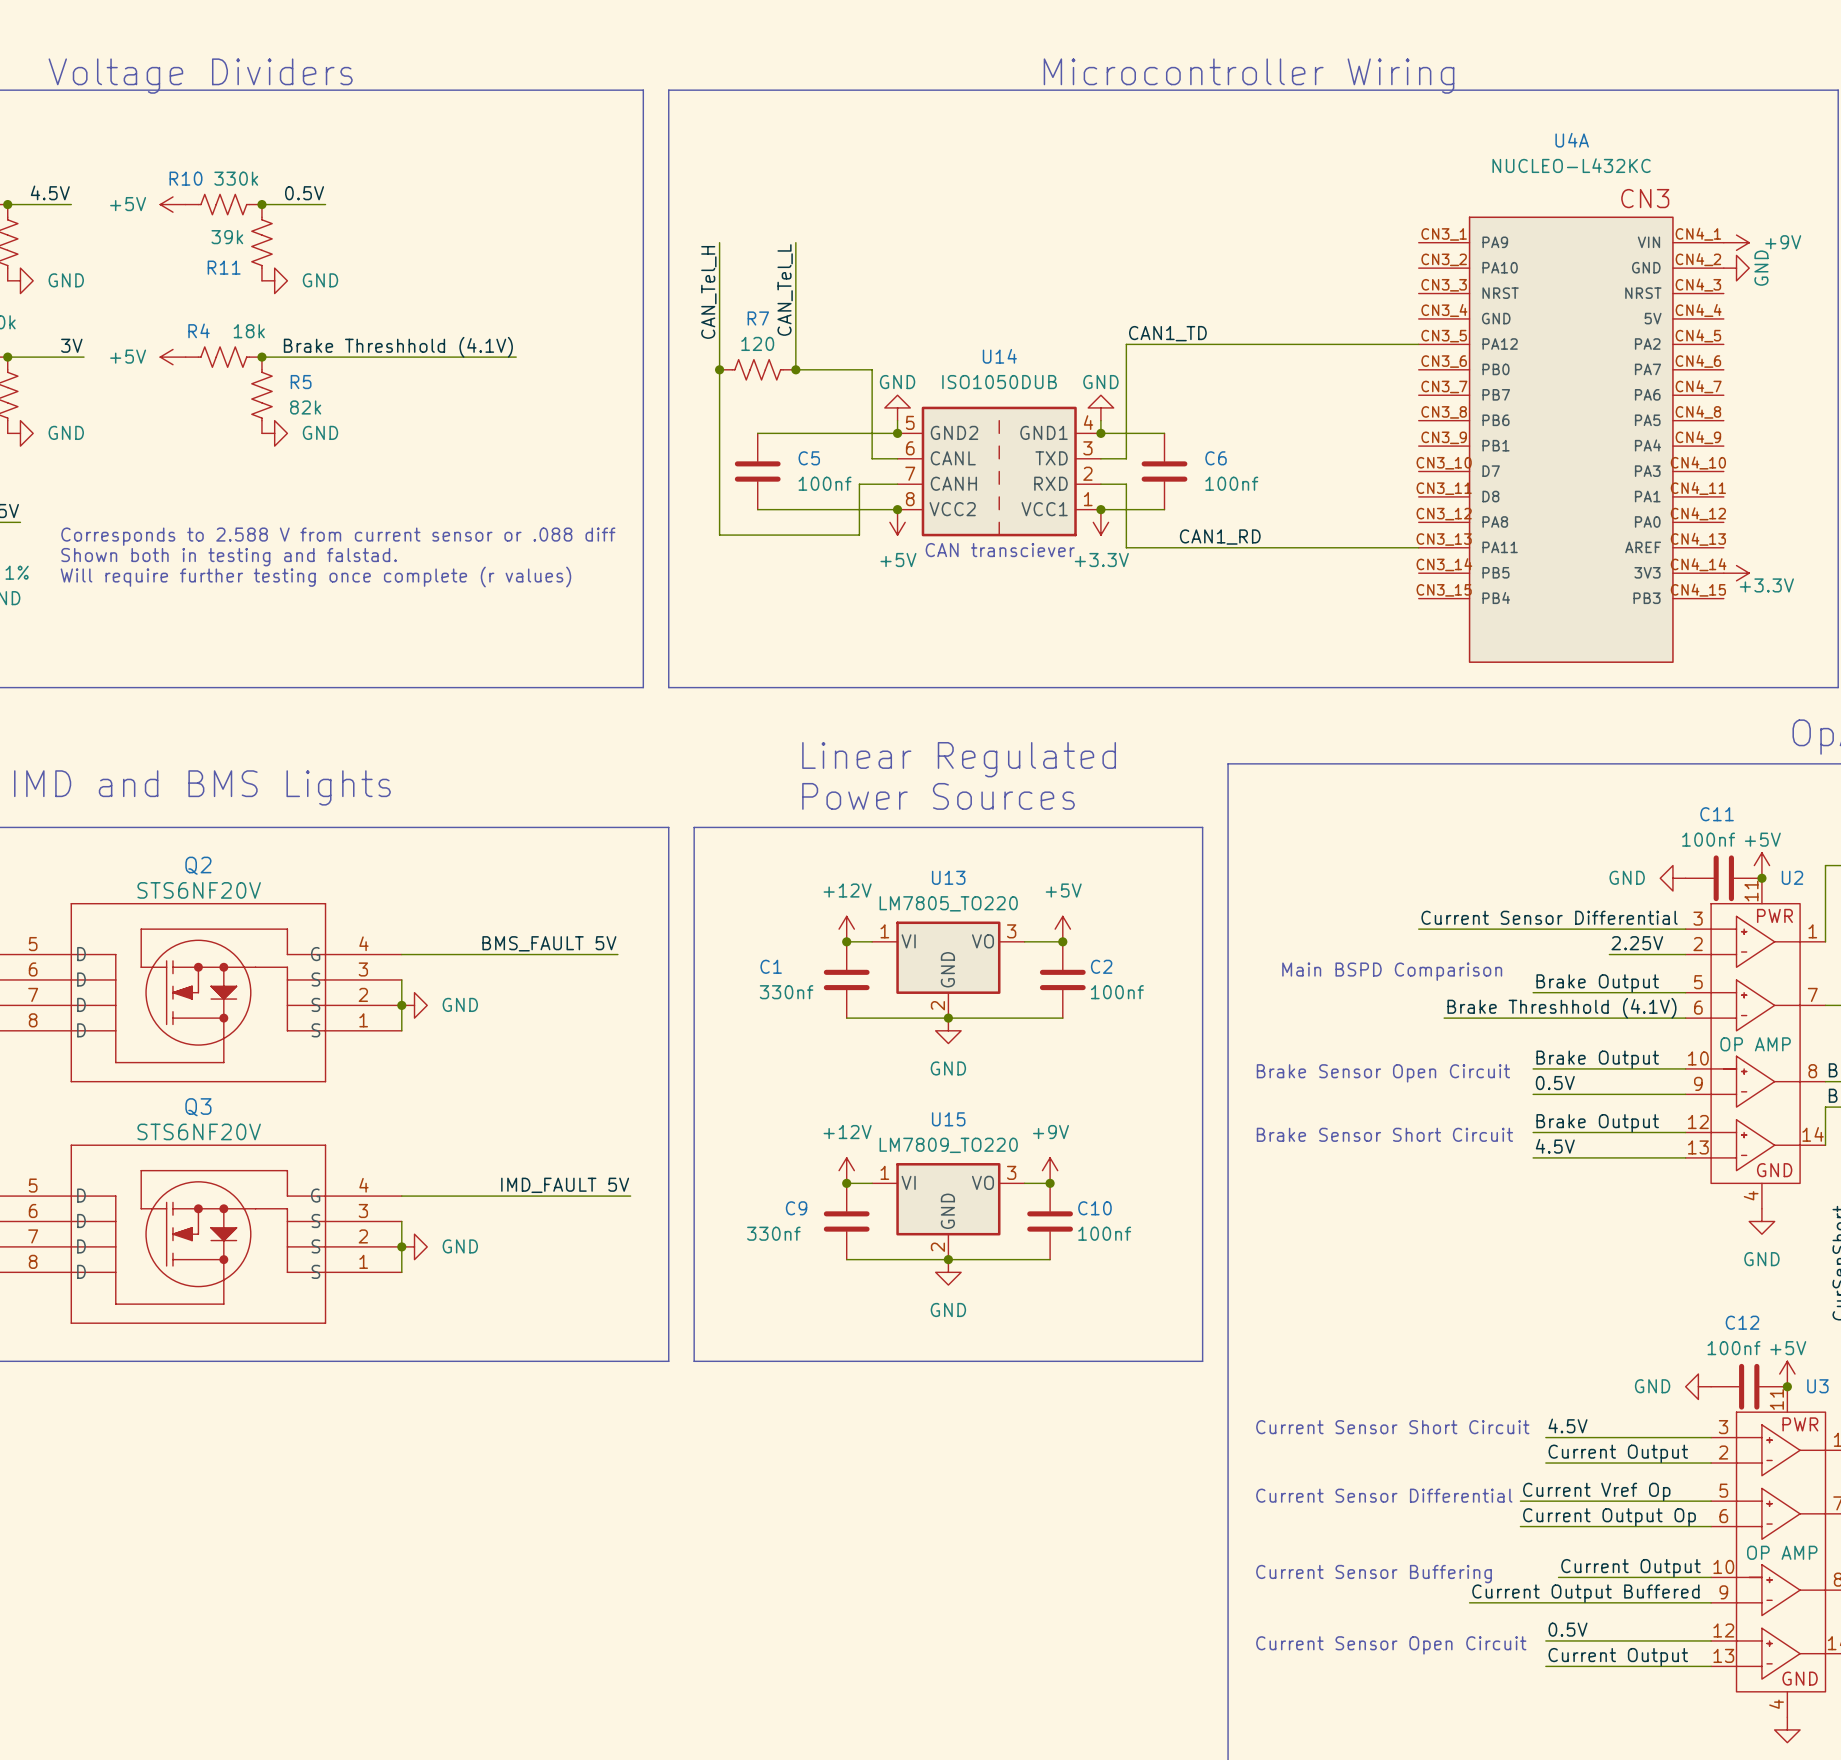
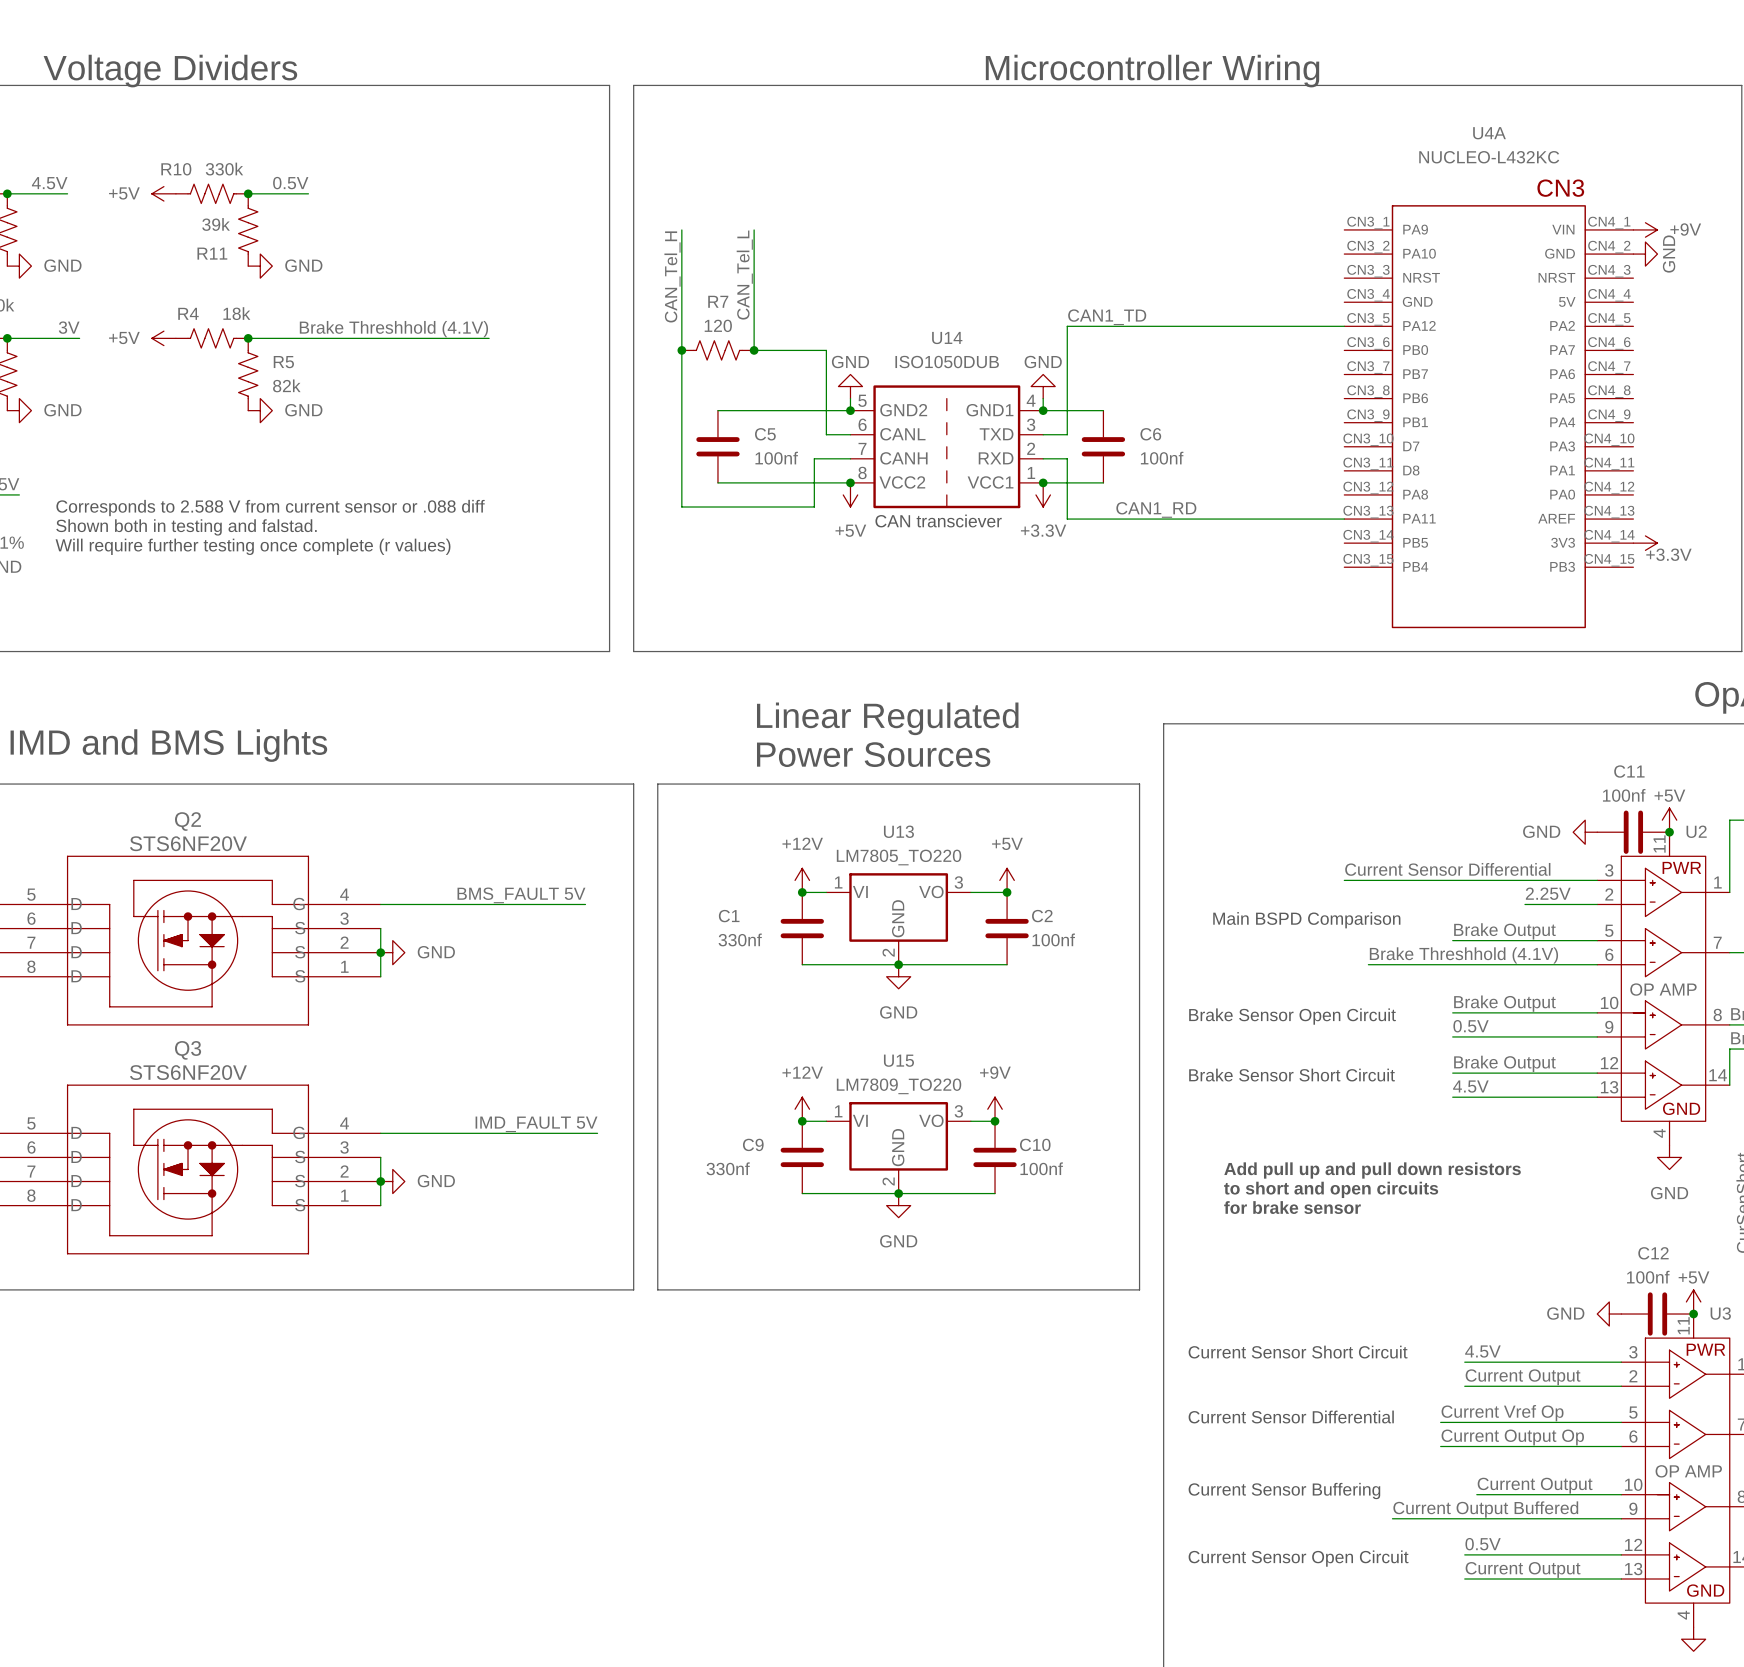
text: none -> Add pull up and pull down resistors (1372, 1170)
text: none -> to short and open circuits (1331, 1189)
text: none -> for brake sensor (1292, 1207)

